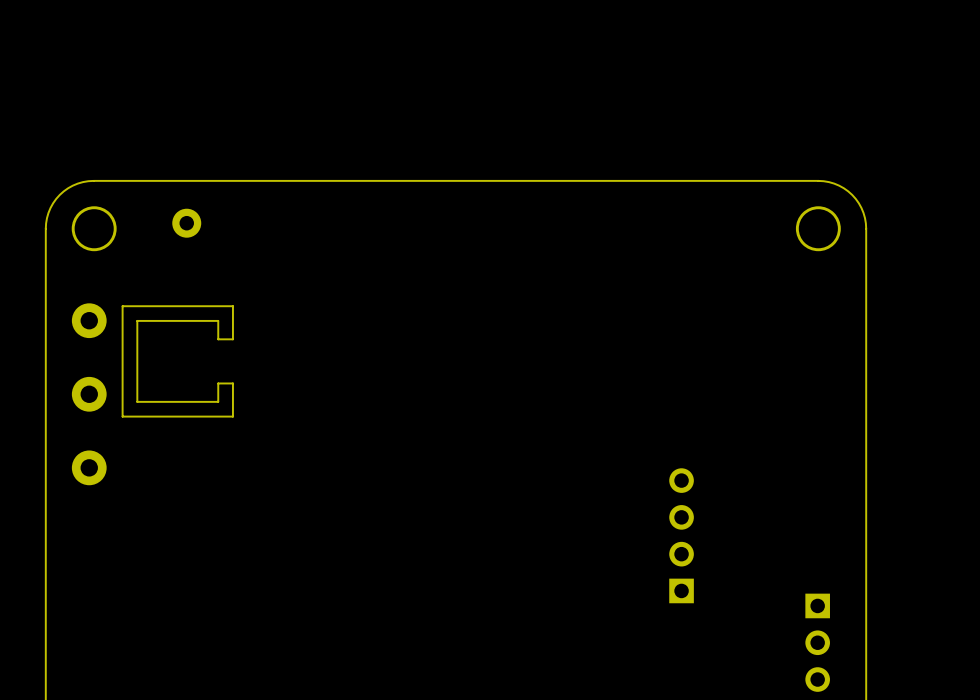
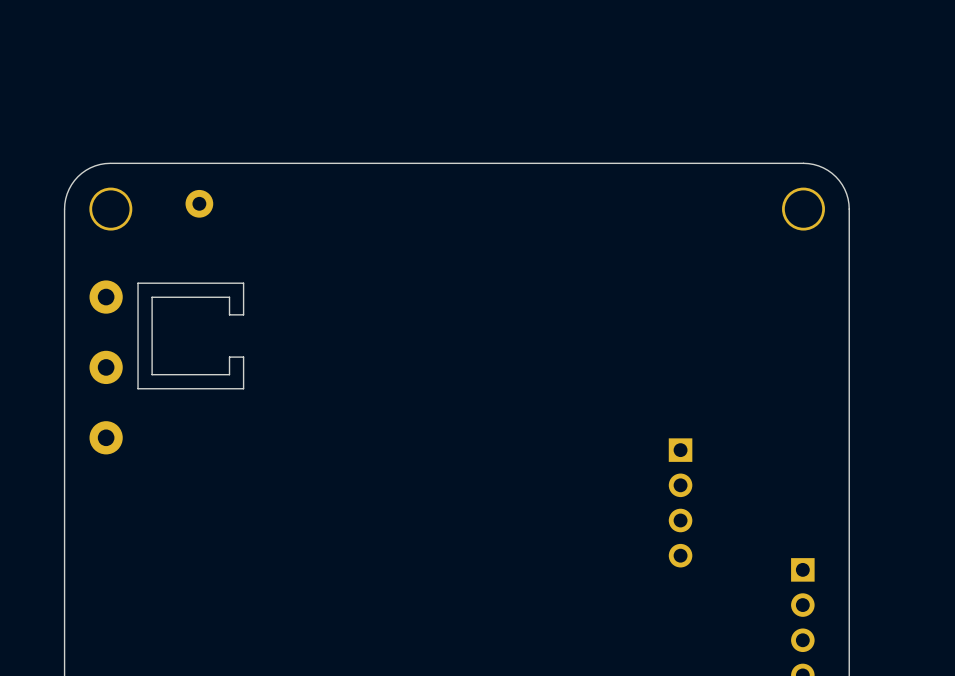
part rotation: 0° (681, 535) -> 180° (680, 502)

